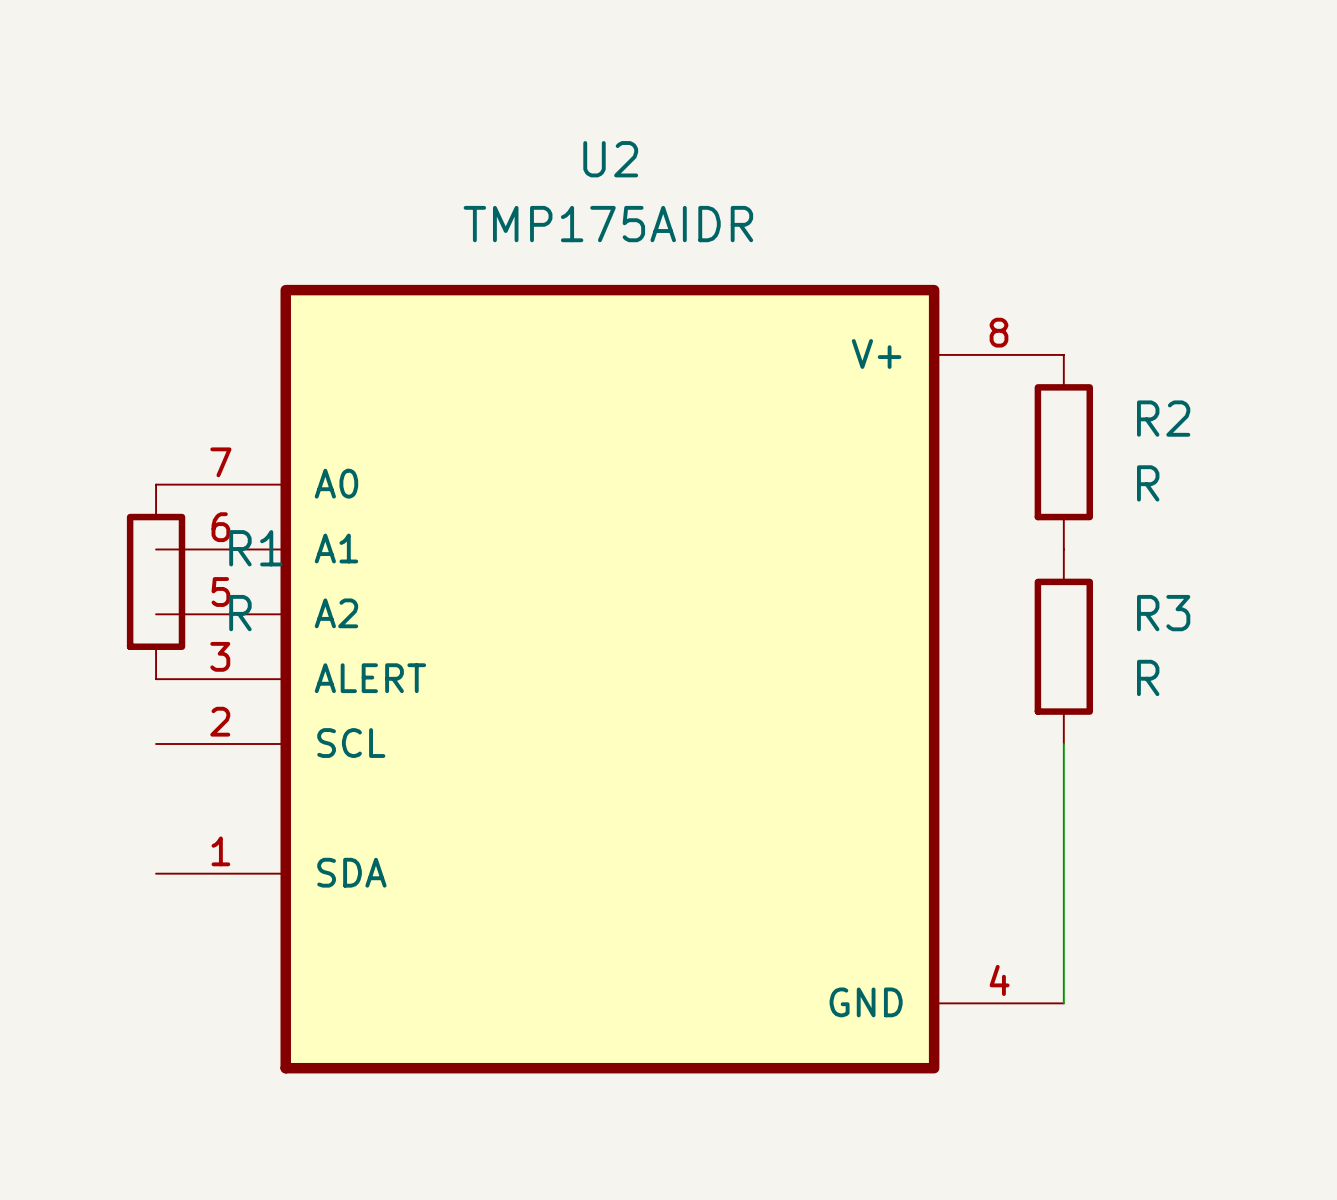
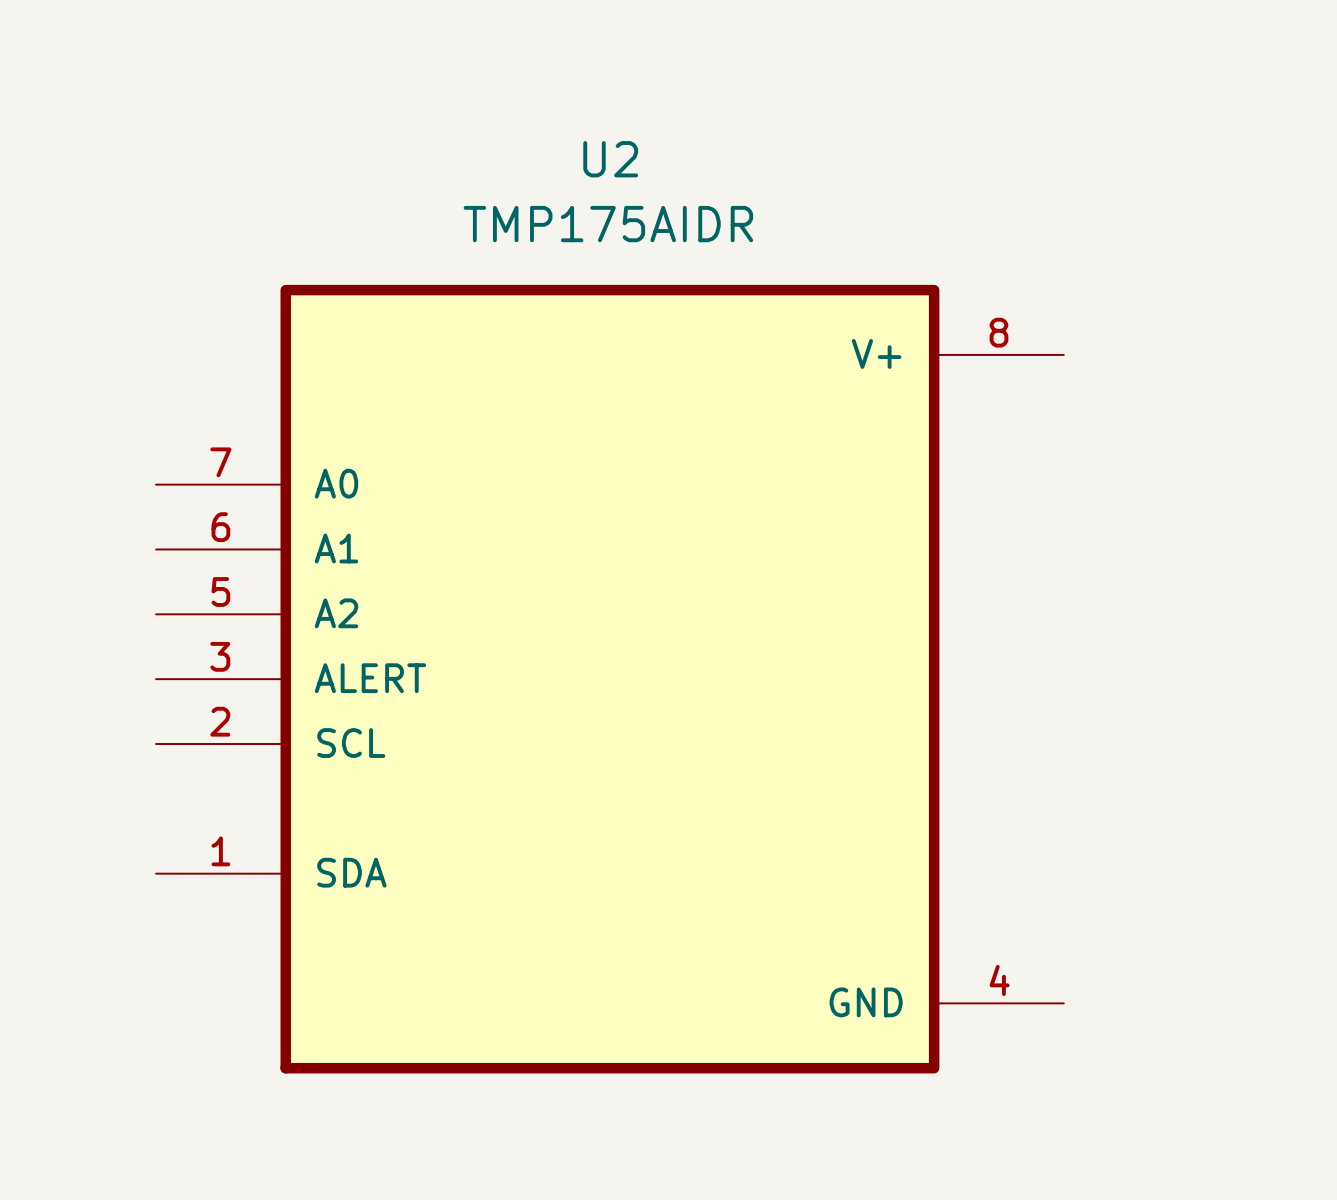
R2: R (1063, 452) -> none
R1: R (156, 581) -> none
R3: R (1063, 646) -> none
wire: (1063, 744) (1063, 1003) -> none

